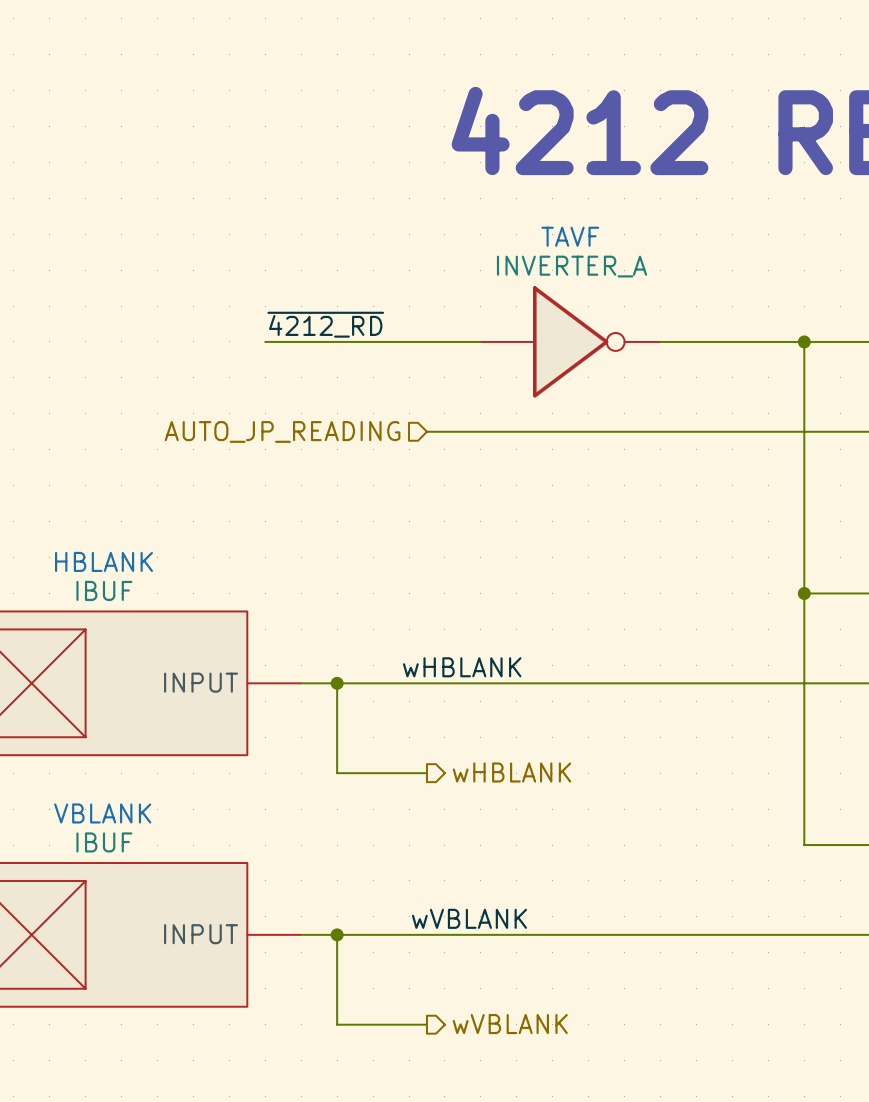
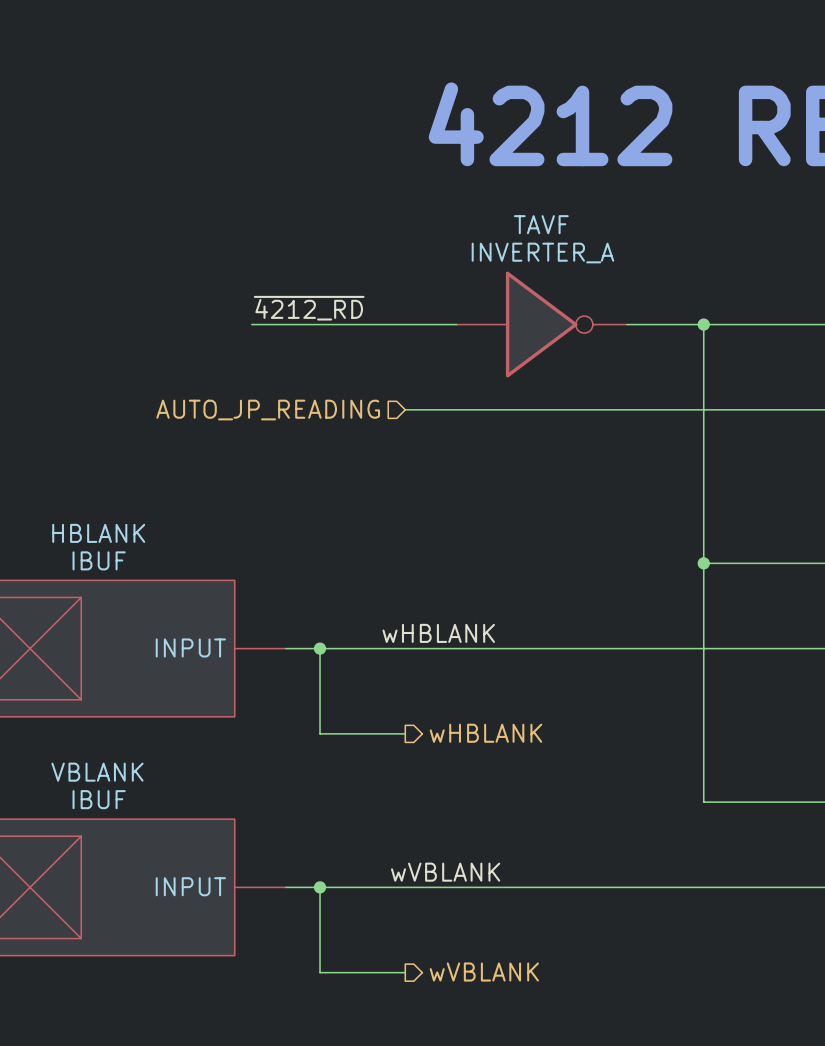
wire: (804, 341) (804, 845) -> (703, 324) (703, 802) (763, 802)
junction position: (804, 341) -> (703, 324)
wire: none -> (703, 563) (763, 563)
junction position: (804, 593) -> (703, 563)

